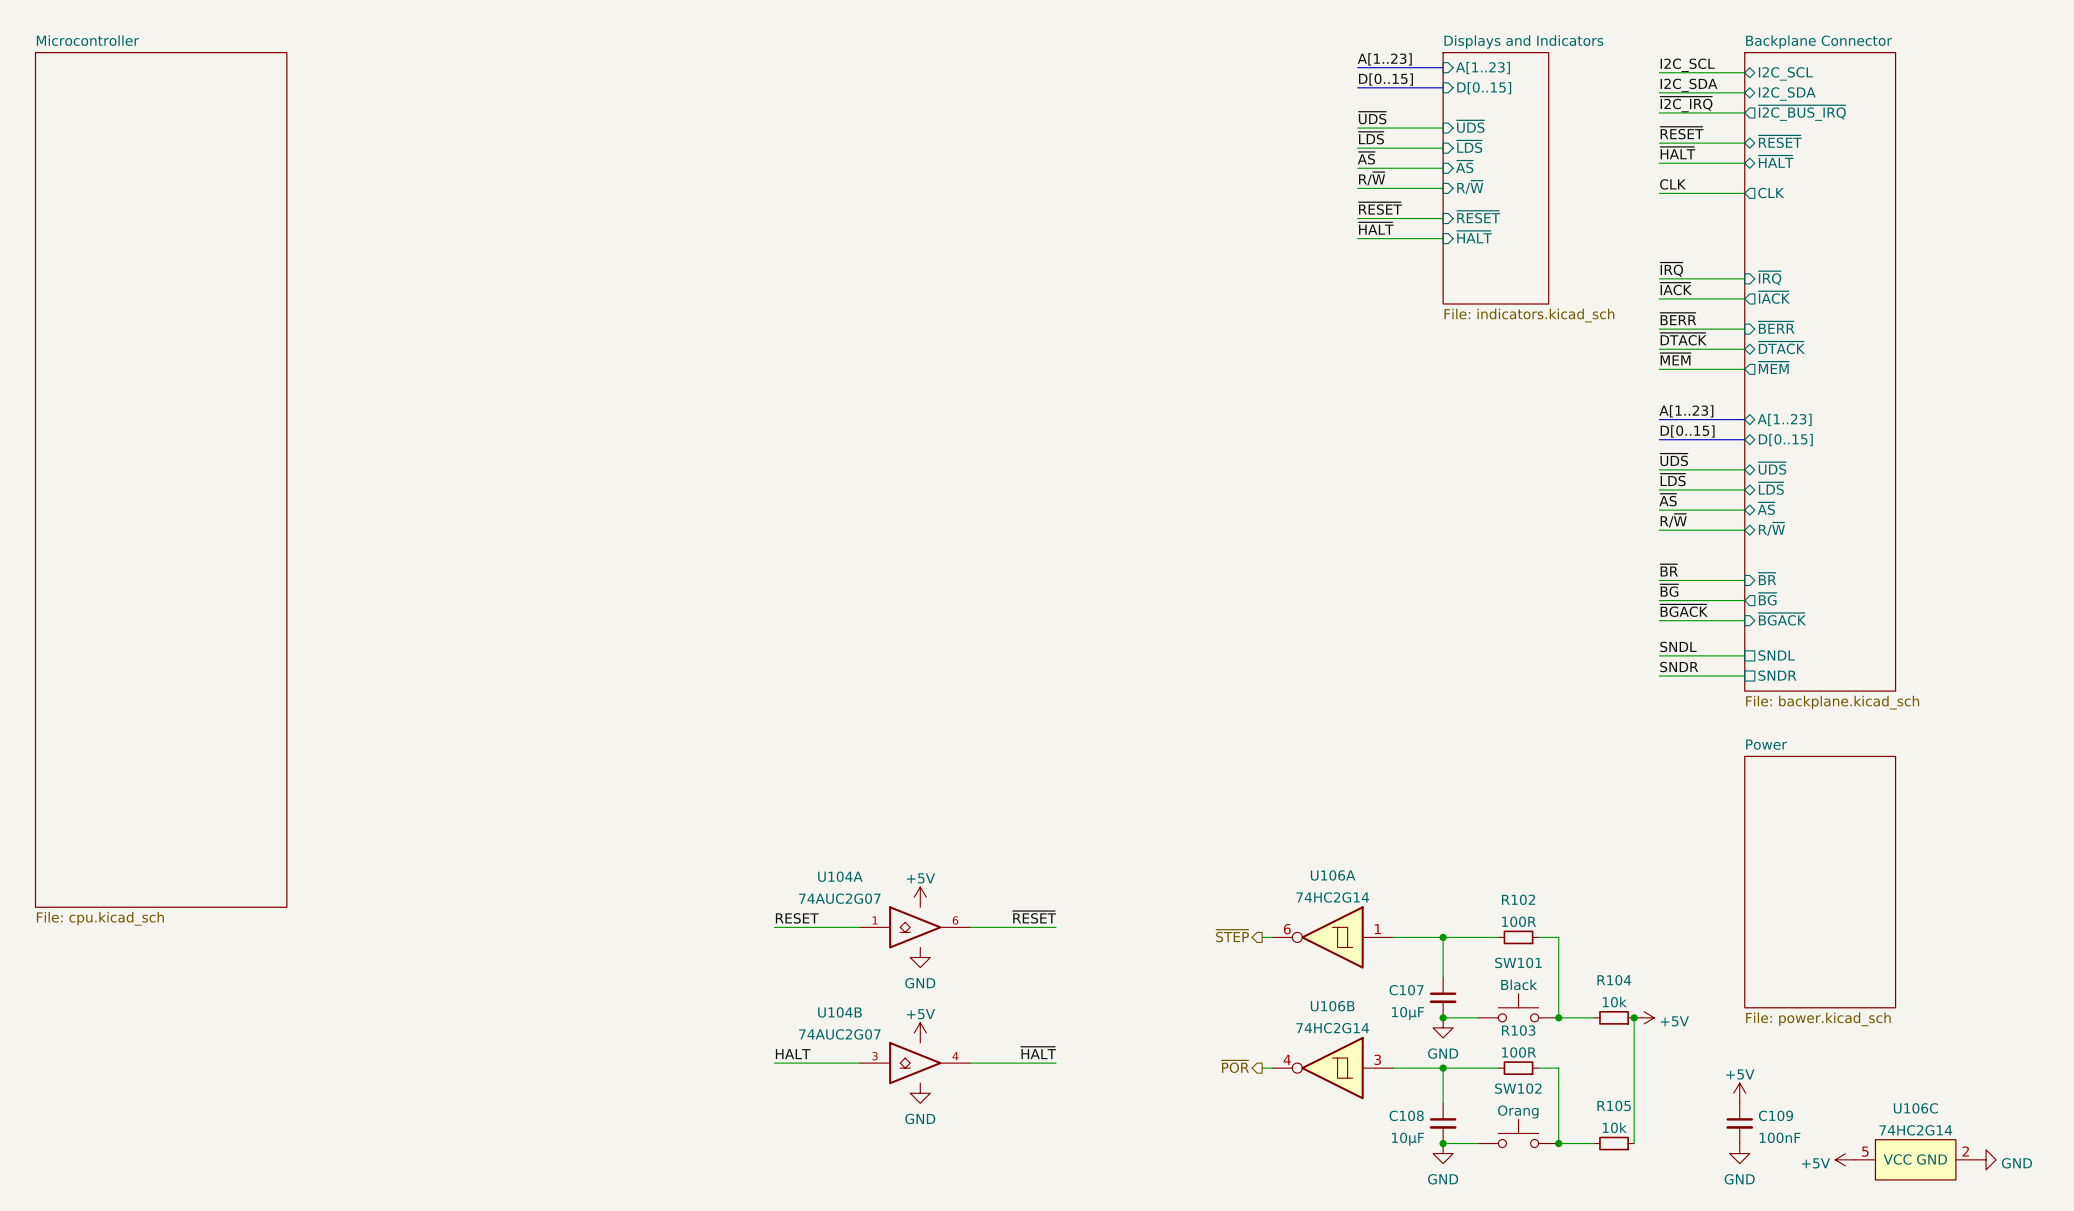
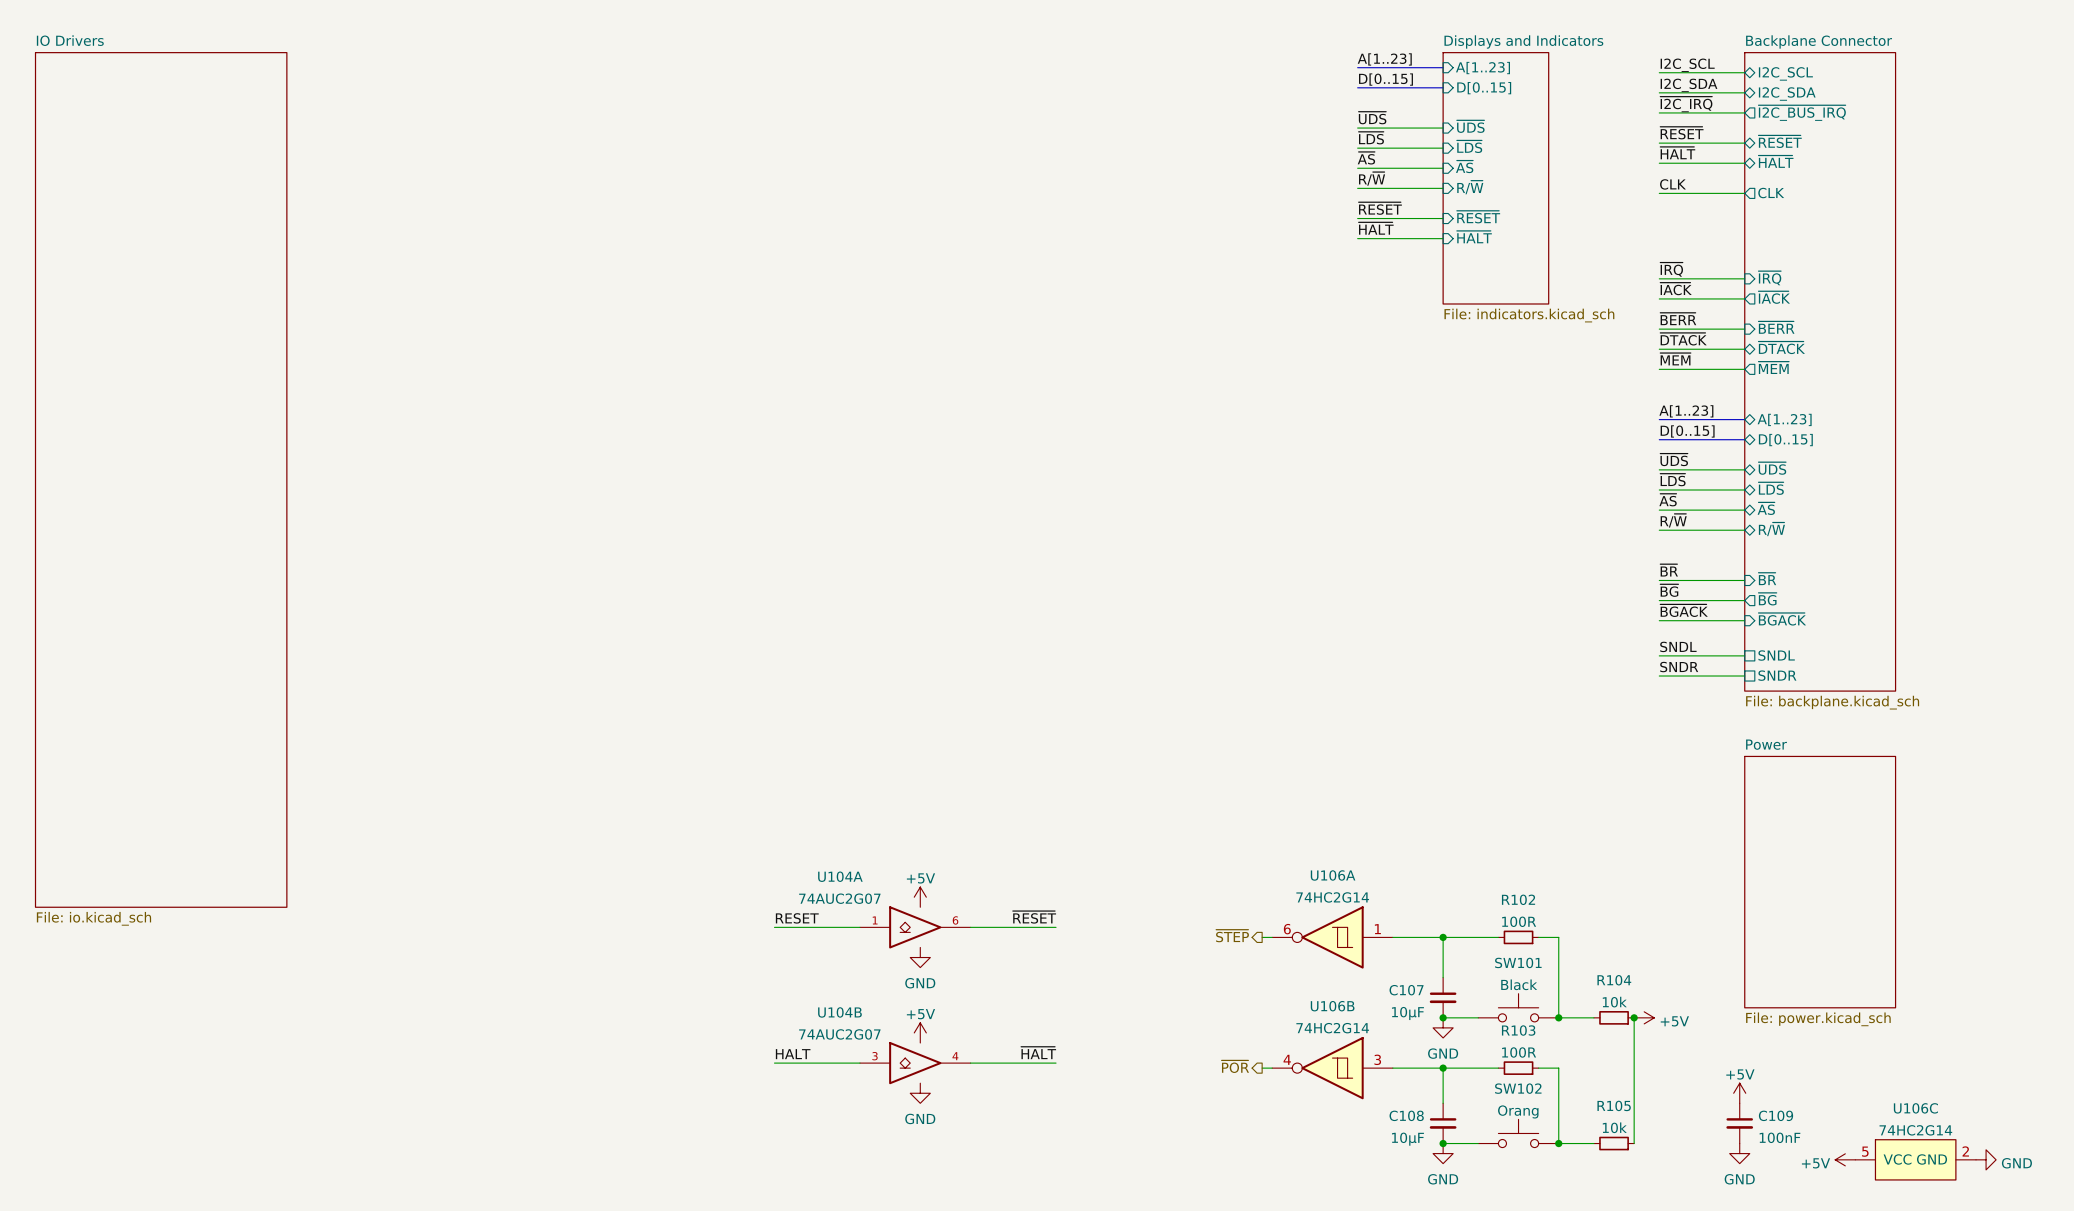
sheet Microcontroller name: Microcontroller (87, 40) -> IO Drivers (70, 40)
sheet Microcontroller value: File: cpu.kicad_sch (100, 918) -> File: io.kicad_sch (93, 918)

